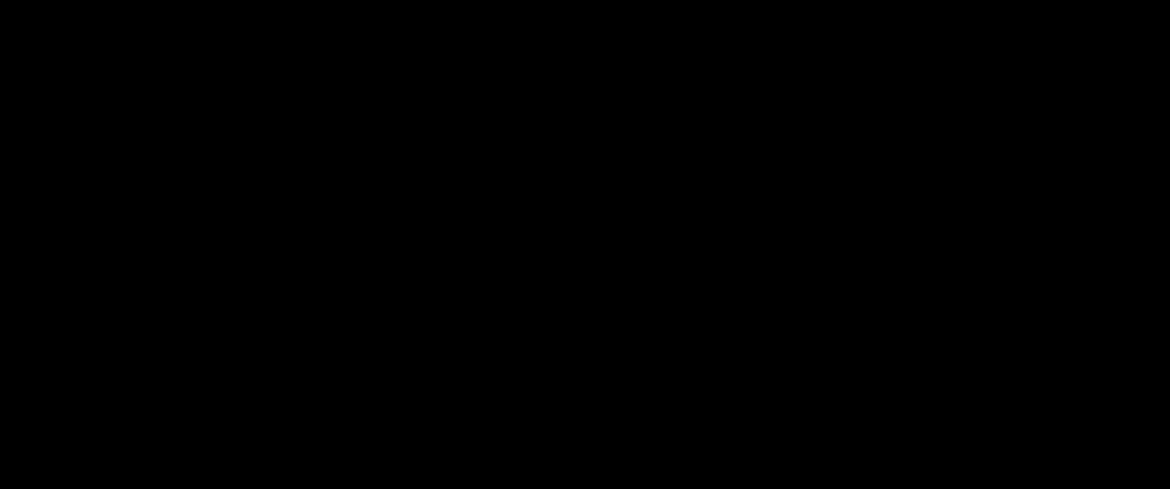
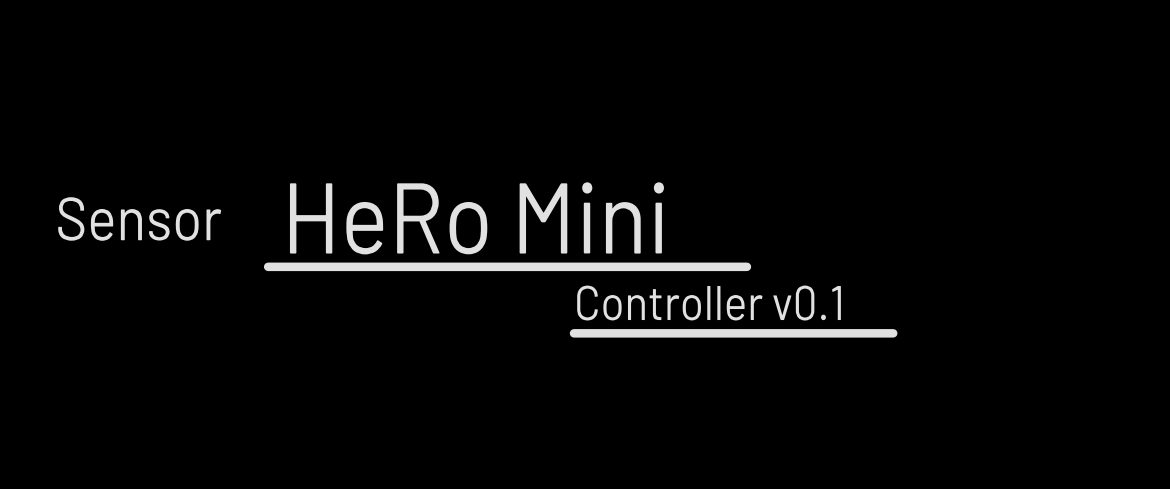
text: none -> Sensor (139, 218)
text: none -> HeRo Mini (476, 218)
line: none -> (268, 266) (746, 266)
text: none -> Controller v0.1 (709, 303)
line: none -> (574, 333) (893, 333)

